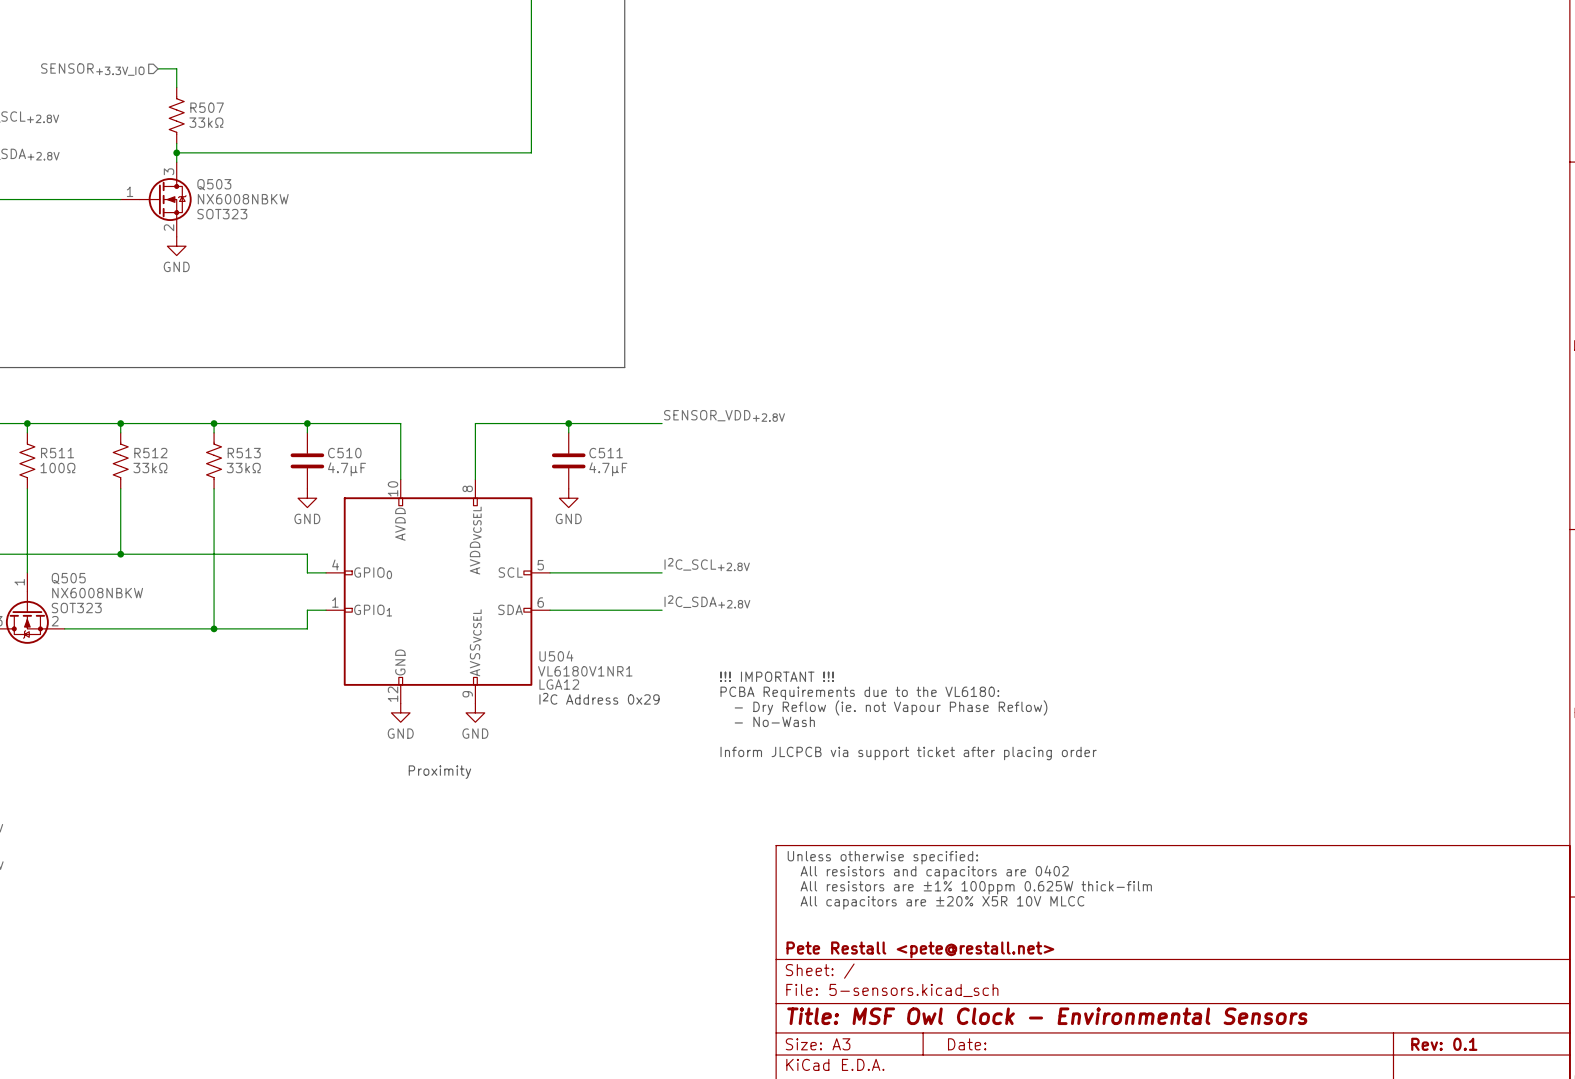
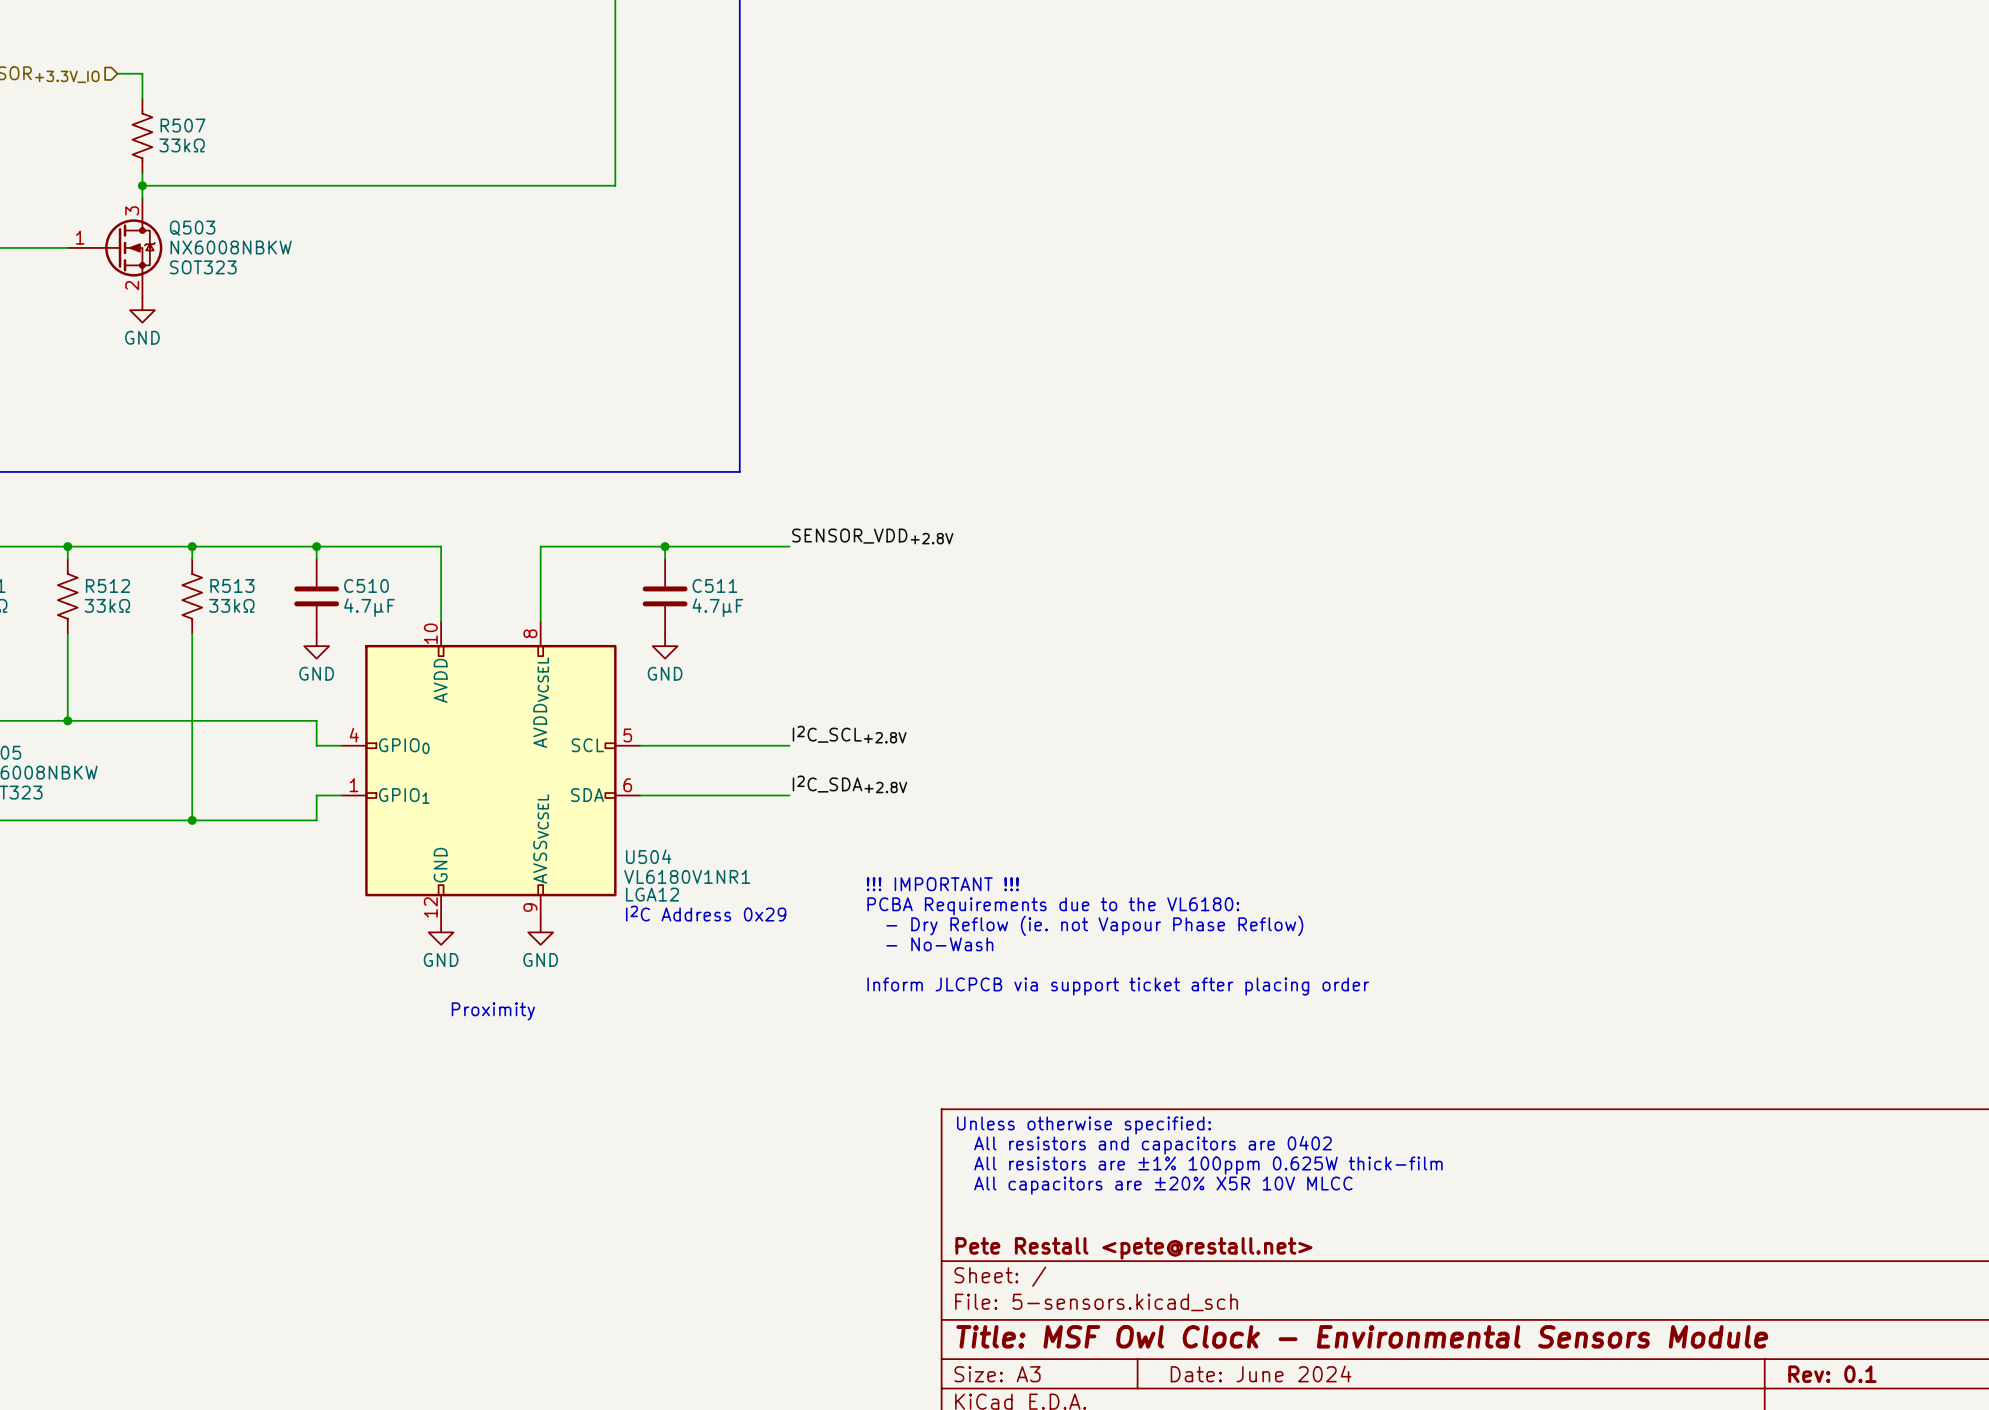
title block: Title: MSF Owl Clock - Environmental Sensors (1047, 1016) -> Title: MSF Owl Clock - Environmental Sensors Module (1362, 1336)
title block: Date: (967, 1044) -> Date: June 2024 (1261, 1373)

